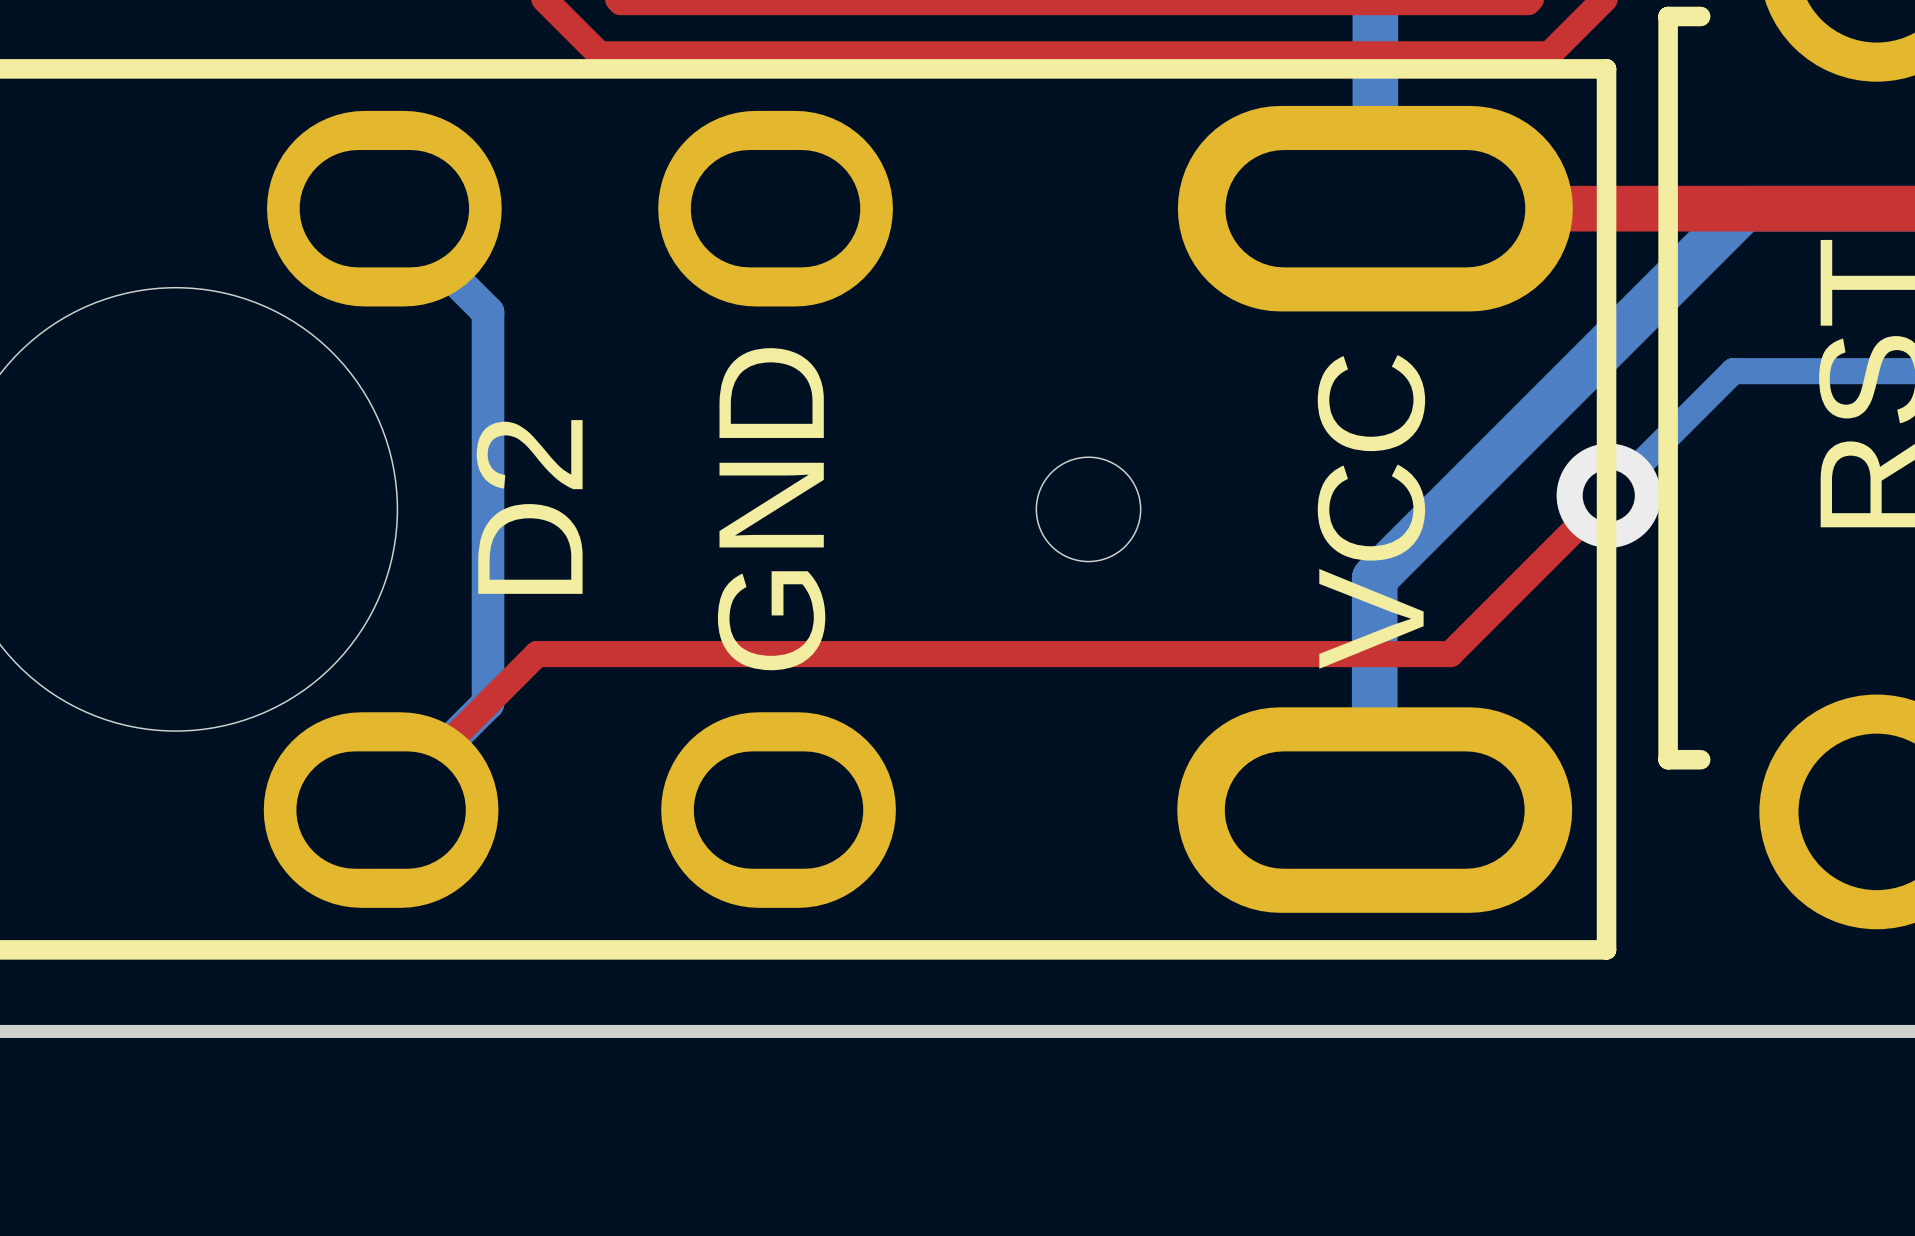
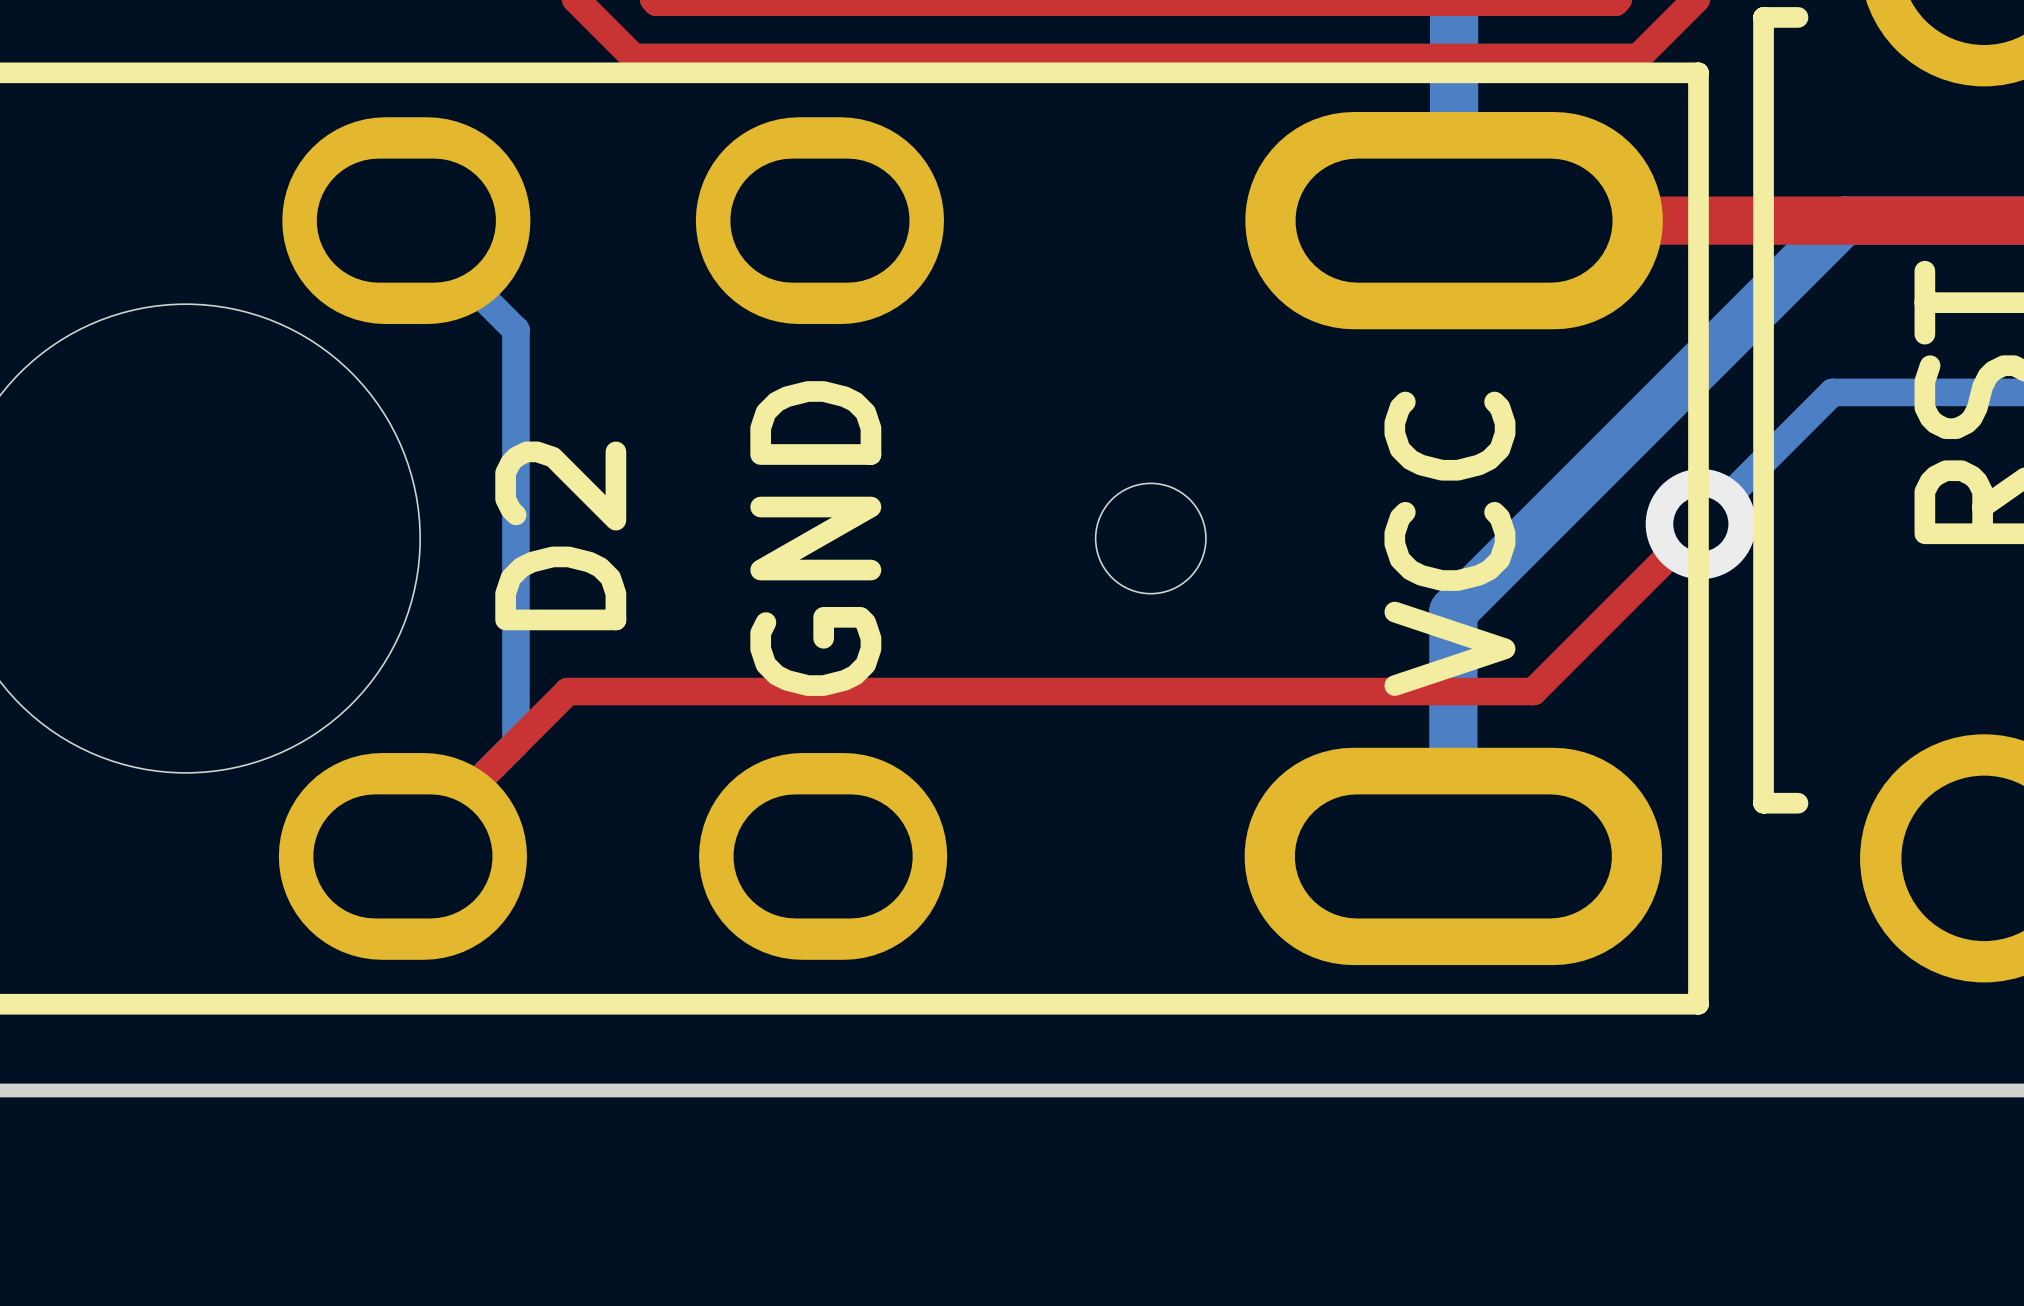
bottom track width: thick (384, 208) (488, 312) (488, 703) (381, 810) -> thin (406, 220) (515, 330) (515, 743) (402, 856)

